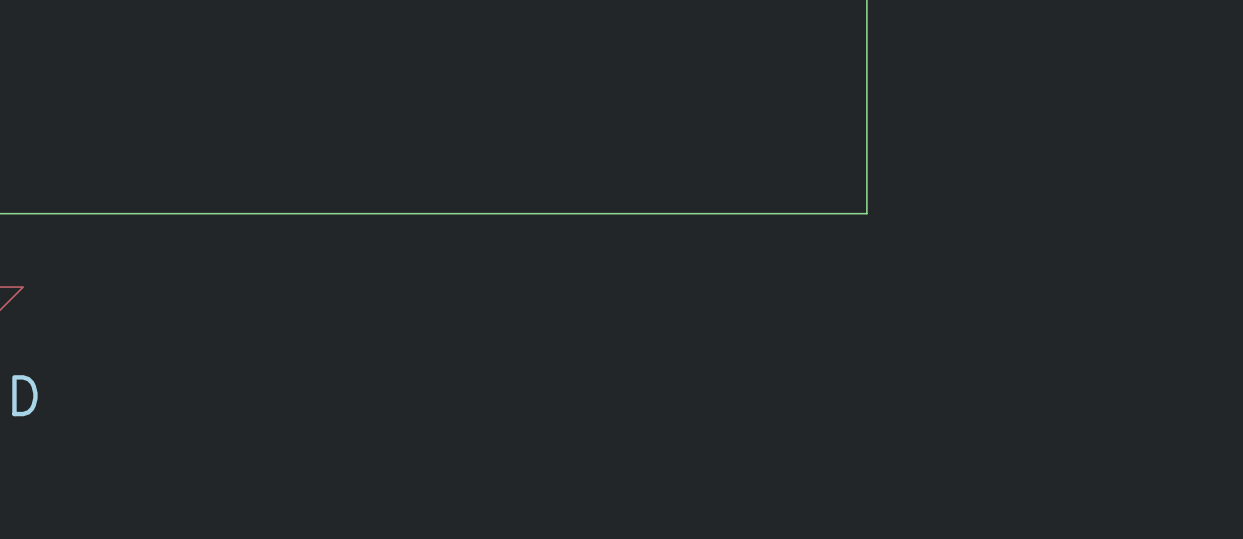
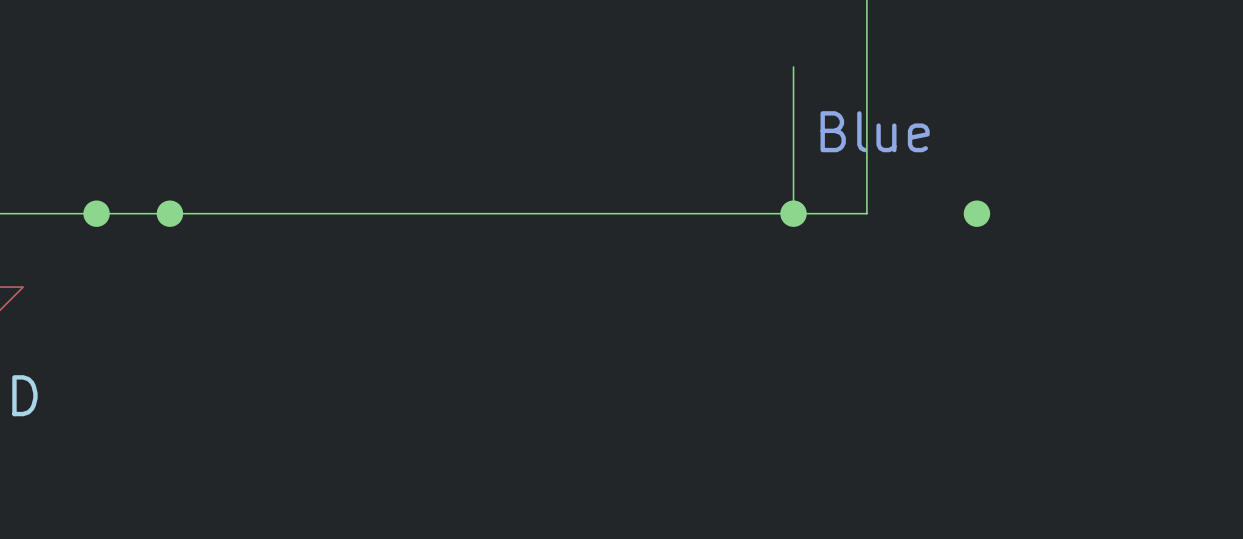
wire: none -> (793, 66) (793, 213)
text: none -> Blue (875, 131)
junction: none -> (96, 213)
junction: none -> (169, 213)
junction: none -> (793, 213)
junction: none -> (976, 213)

